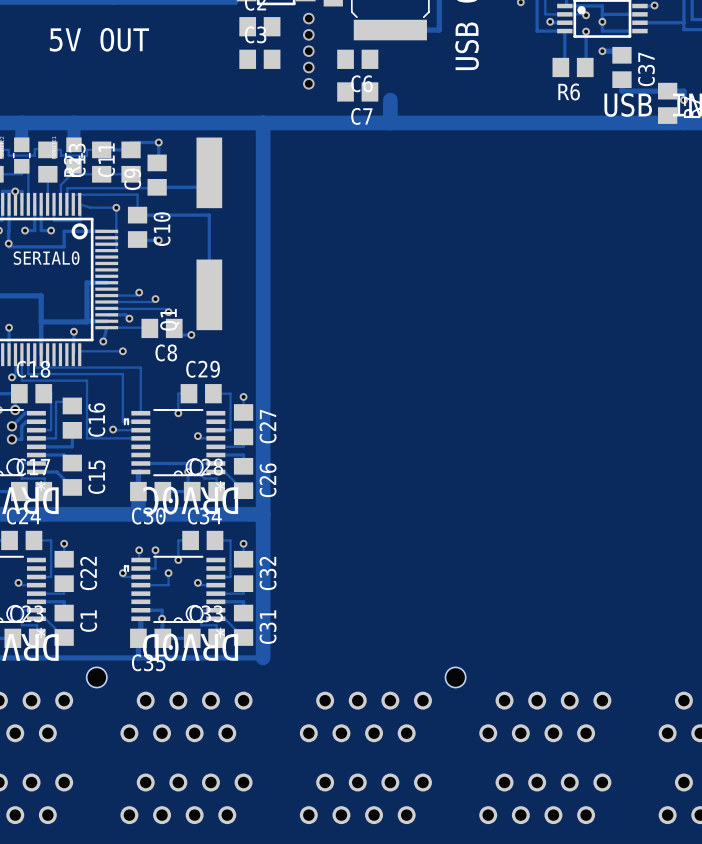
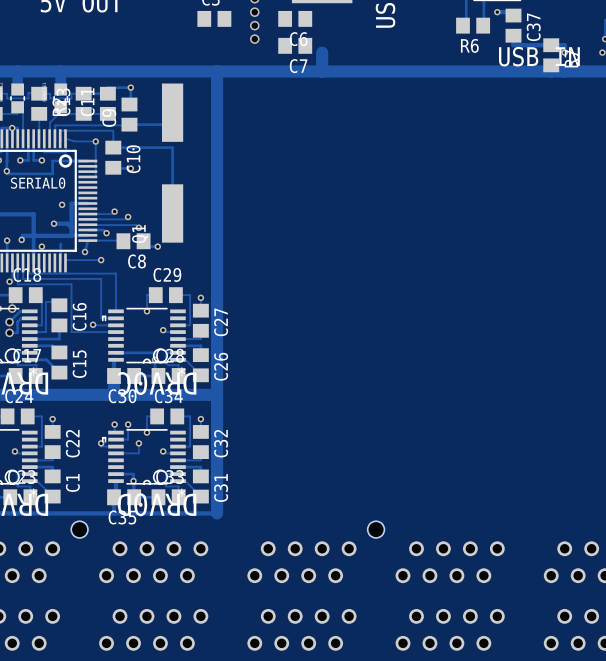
via: none -> (62, 204)
track: none -> (54, 223) (67, 223) (71, 227)
via: none -> (54, 223)
track: none -> (33, 235) (23, 235) (21, 239)
via: none -> (21, 239)
via: (73, 331) -> none
via: none -> (41, 246)

